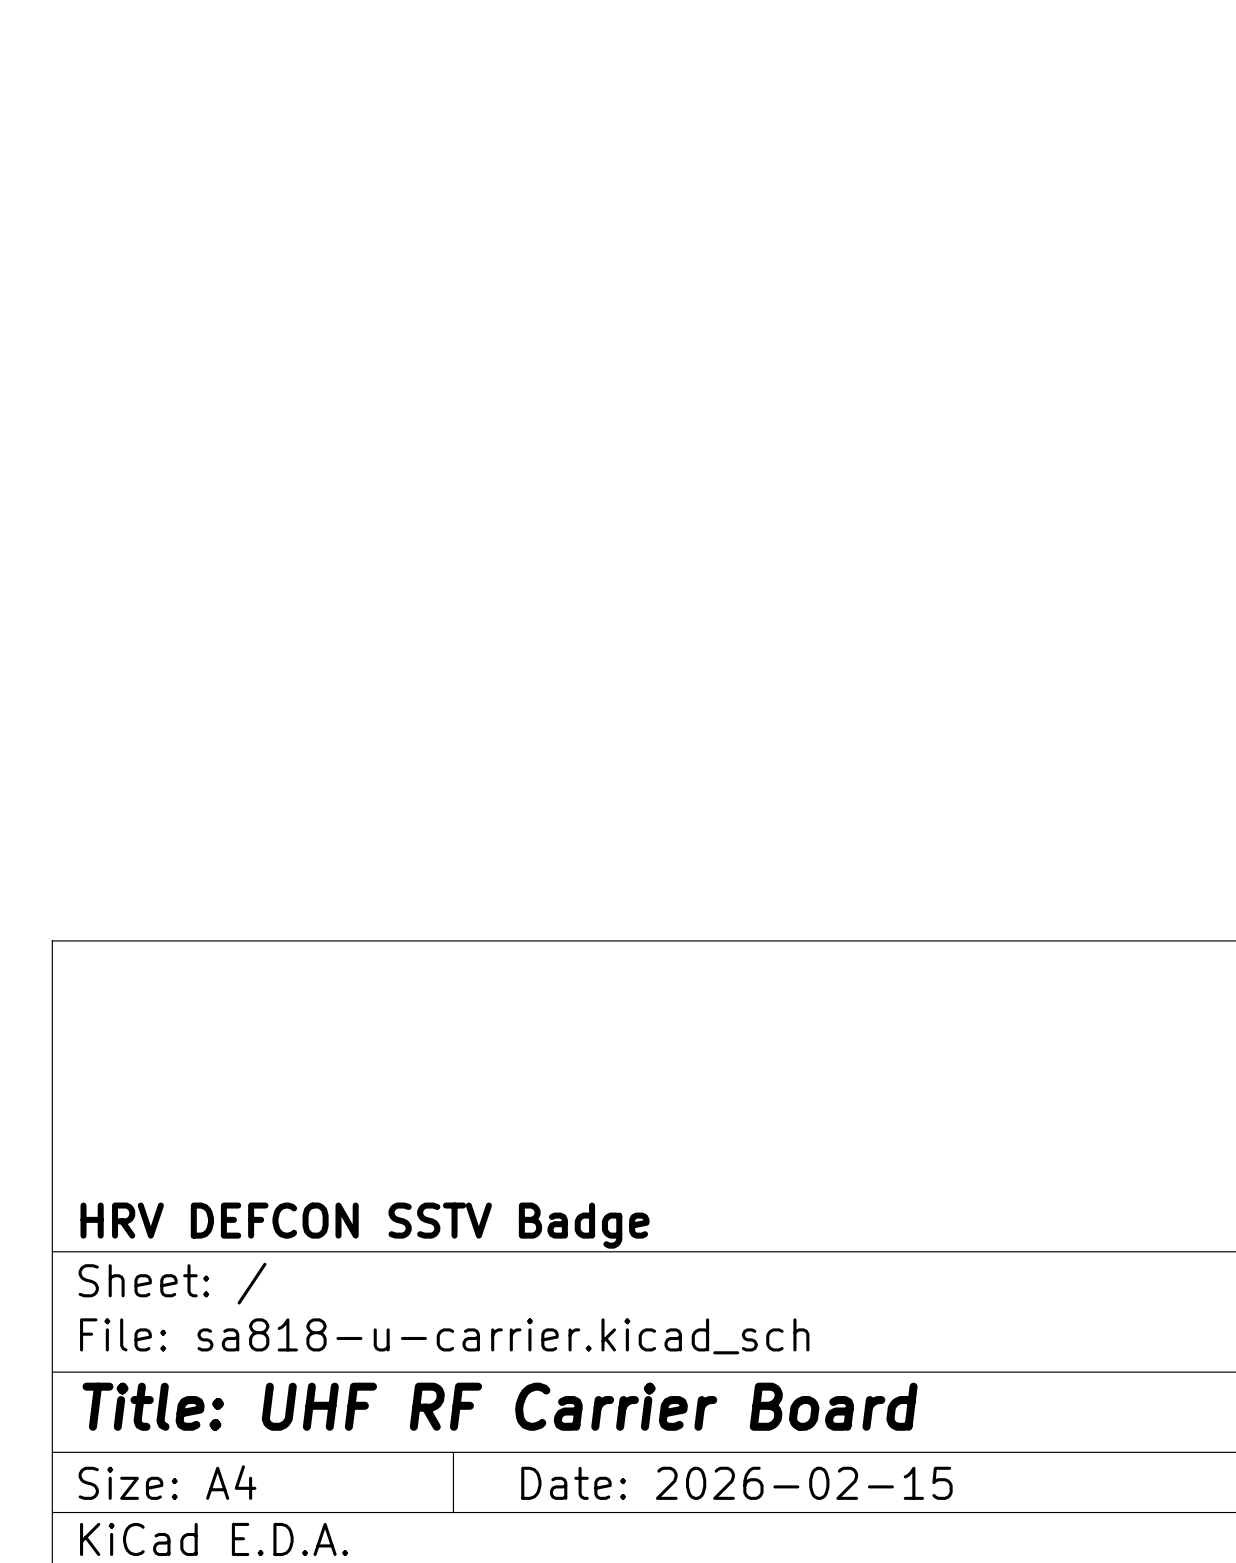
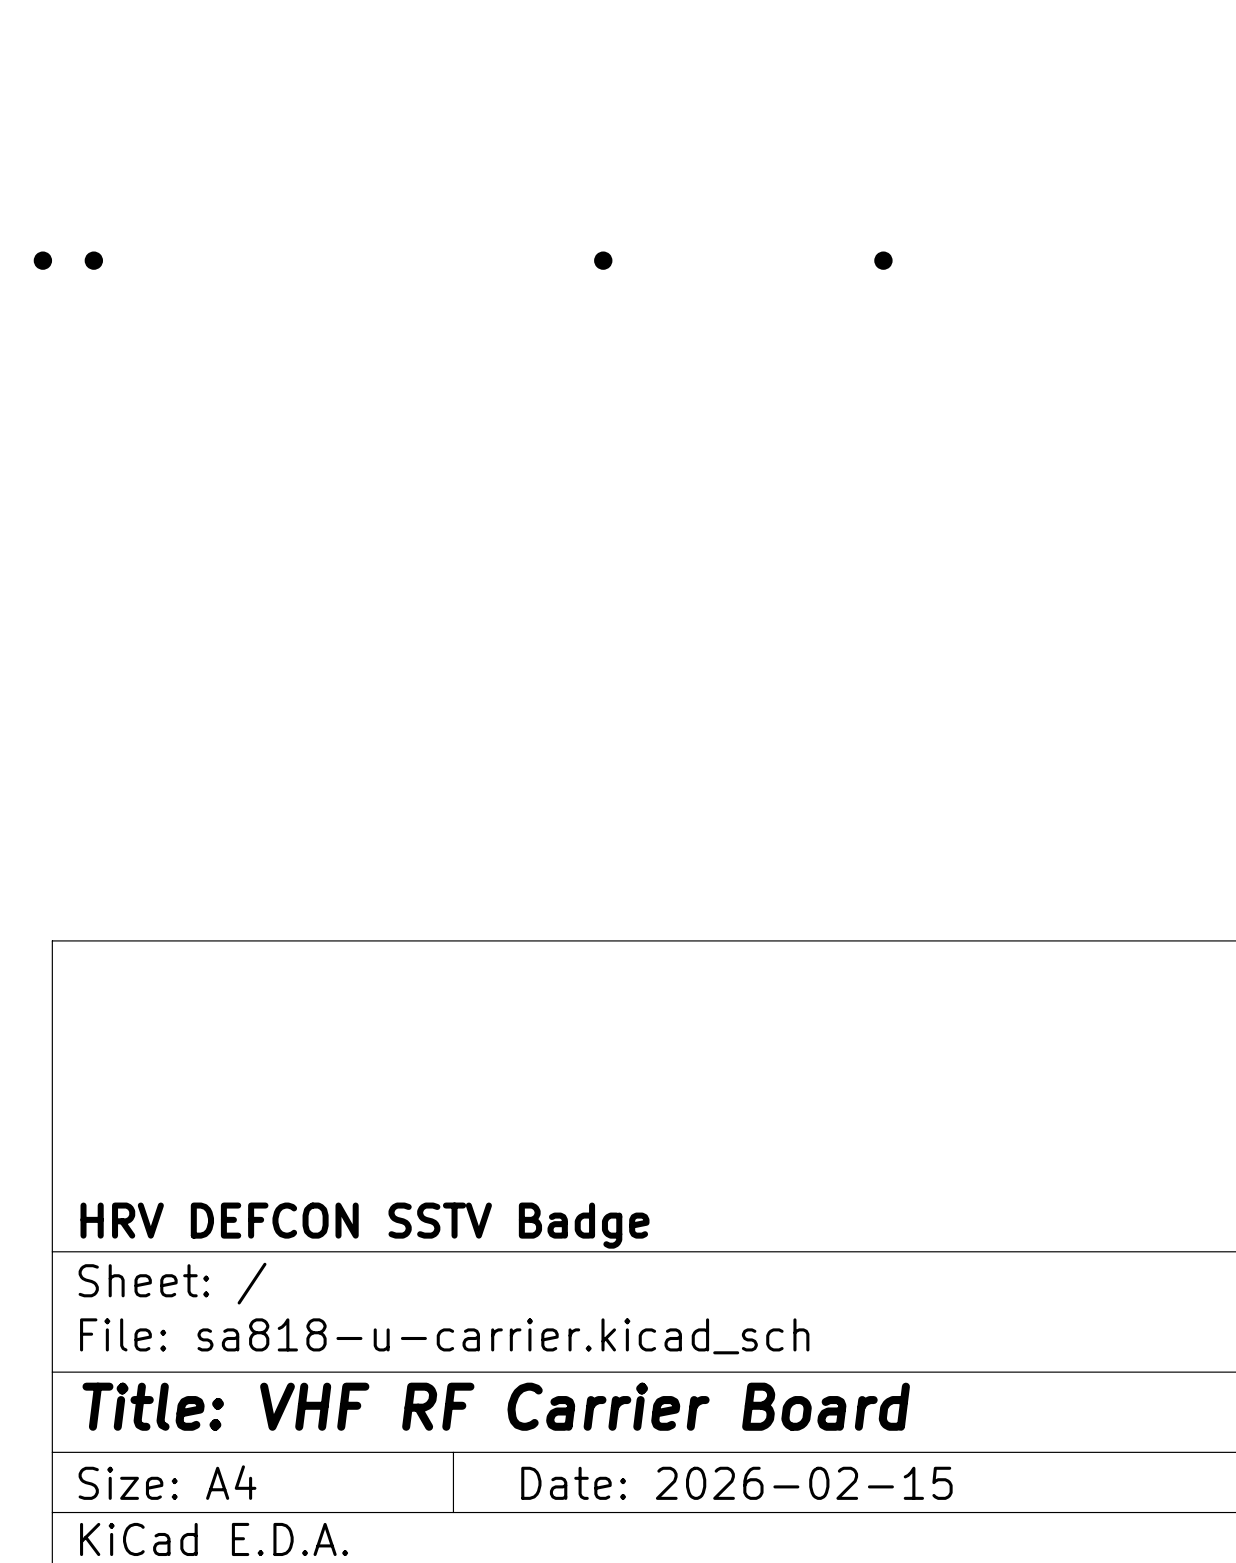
junction: none -> (42, 260)
junction: none -> (93, 260)
junction: none -> (603, 260)
junction: none -> (883, 260)
title block: Title: UHF RF Carrier Board (500, 1406) -> Title: VHF RF Carrier Board (496, 1406)

